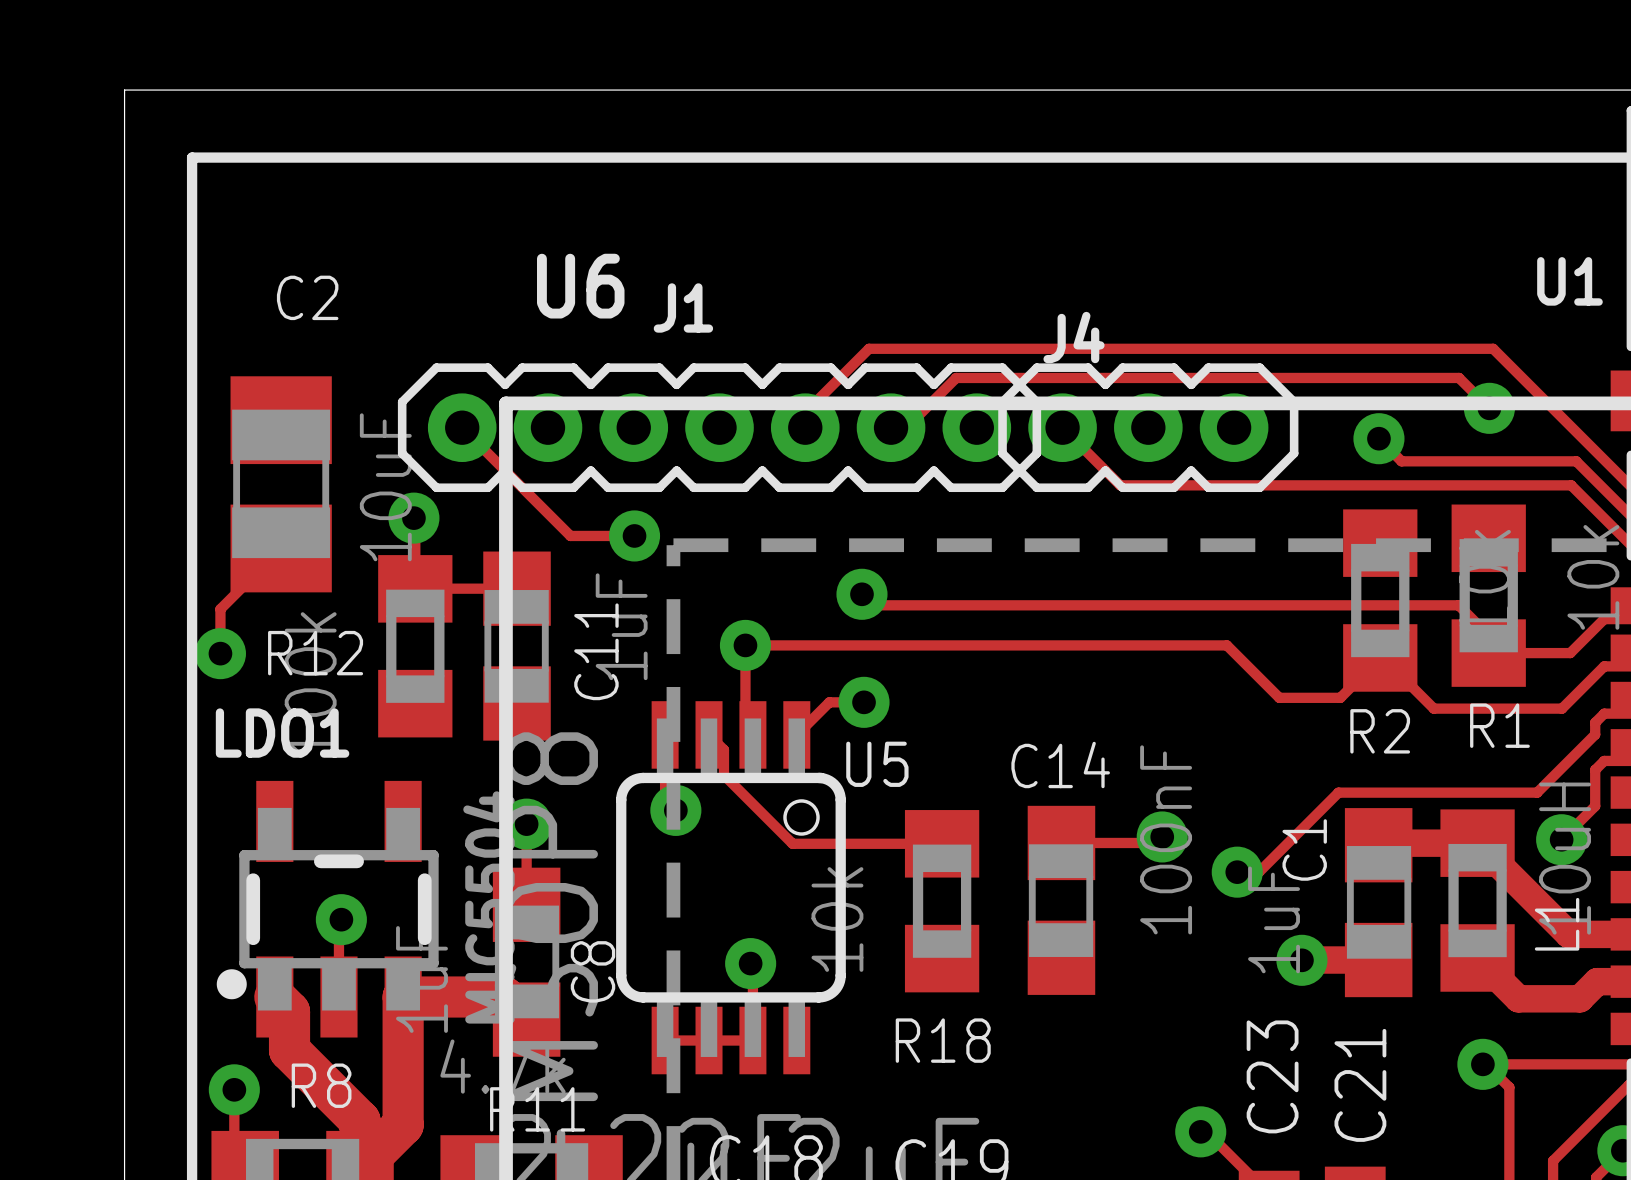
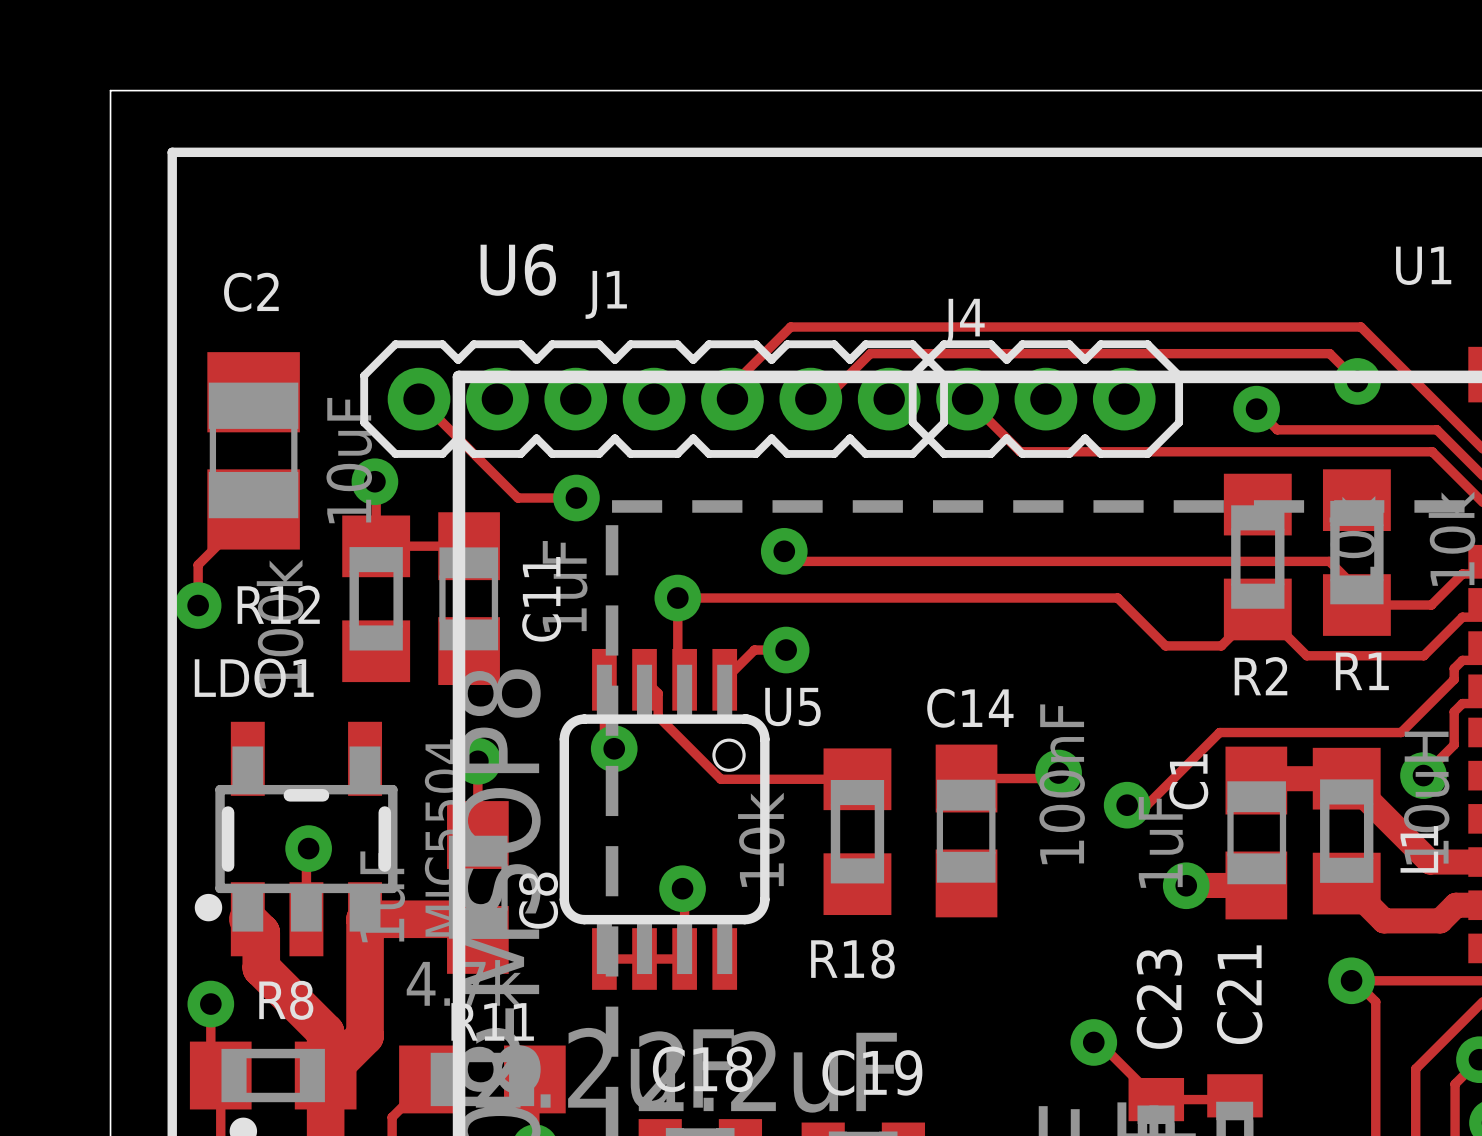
C2 name position: C2 (307, 297) -> C2 (251, 292)

